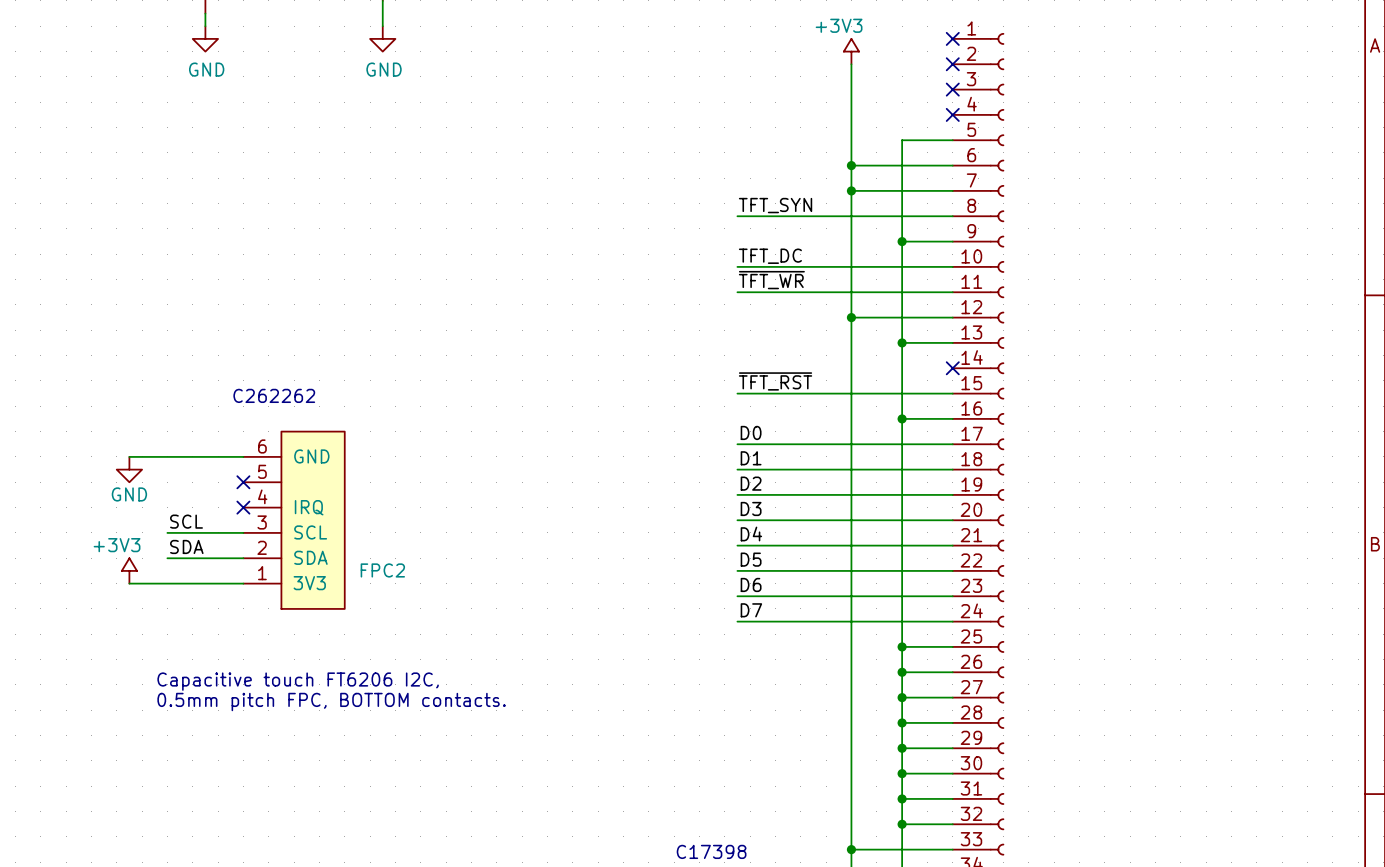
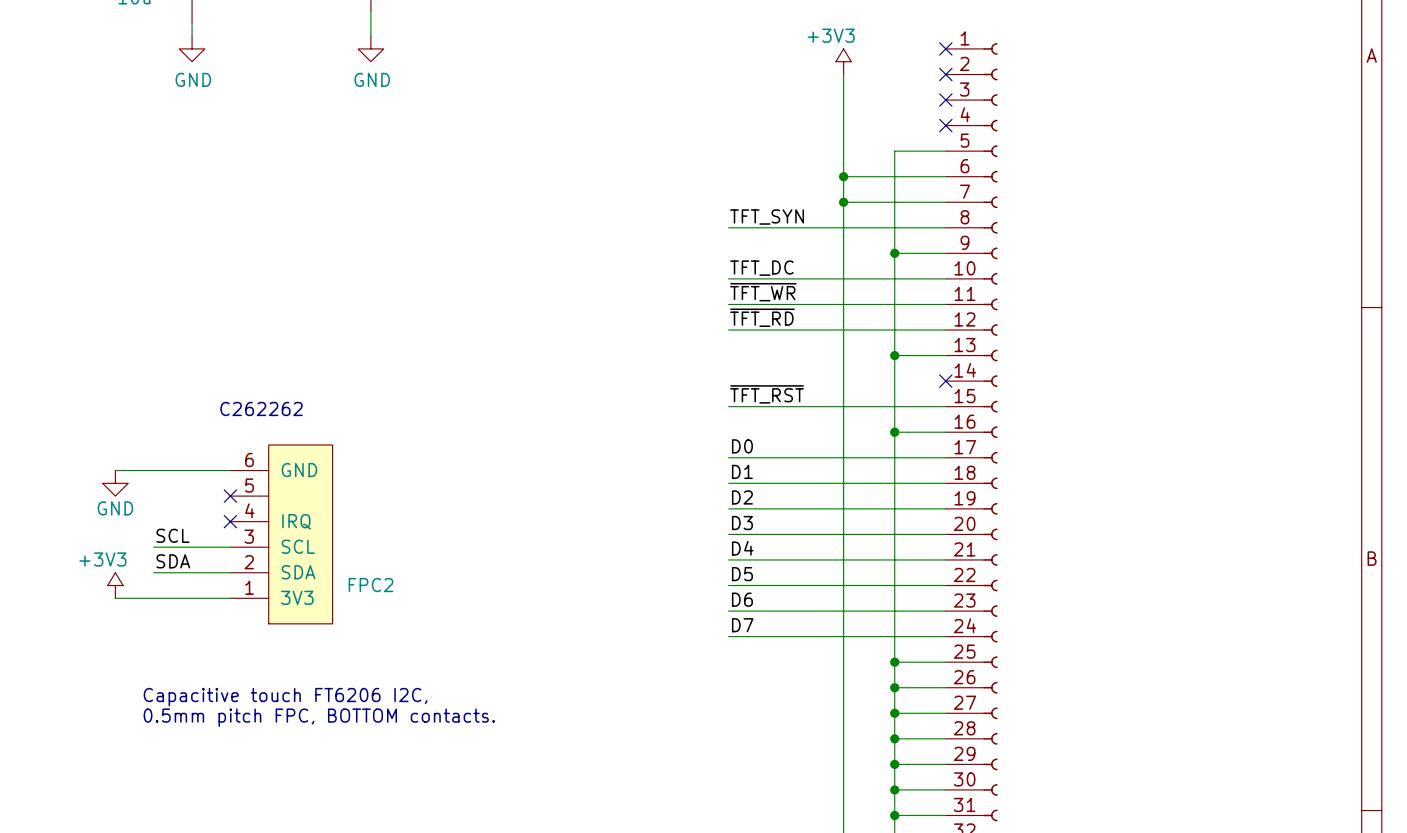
label: none -> ~{TFT_RD} (762, 317)
wire: none -> (728, 330) (843, 330)
junction: (851, 317) -> none

